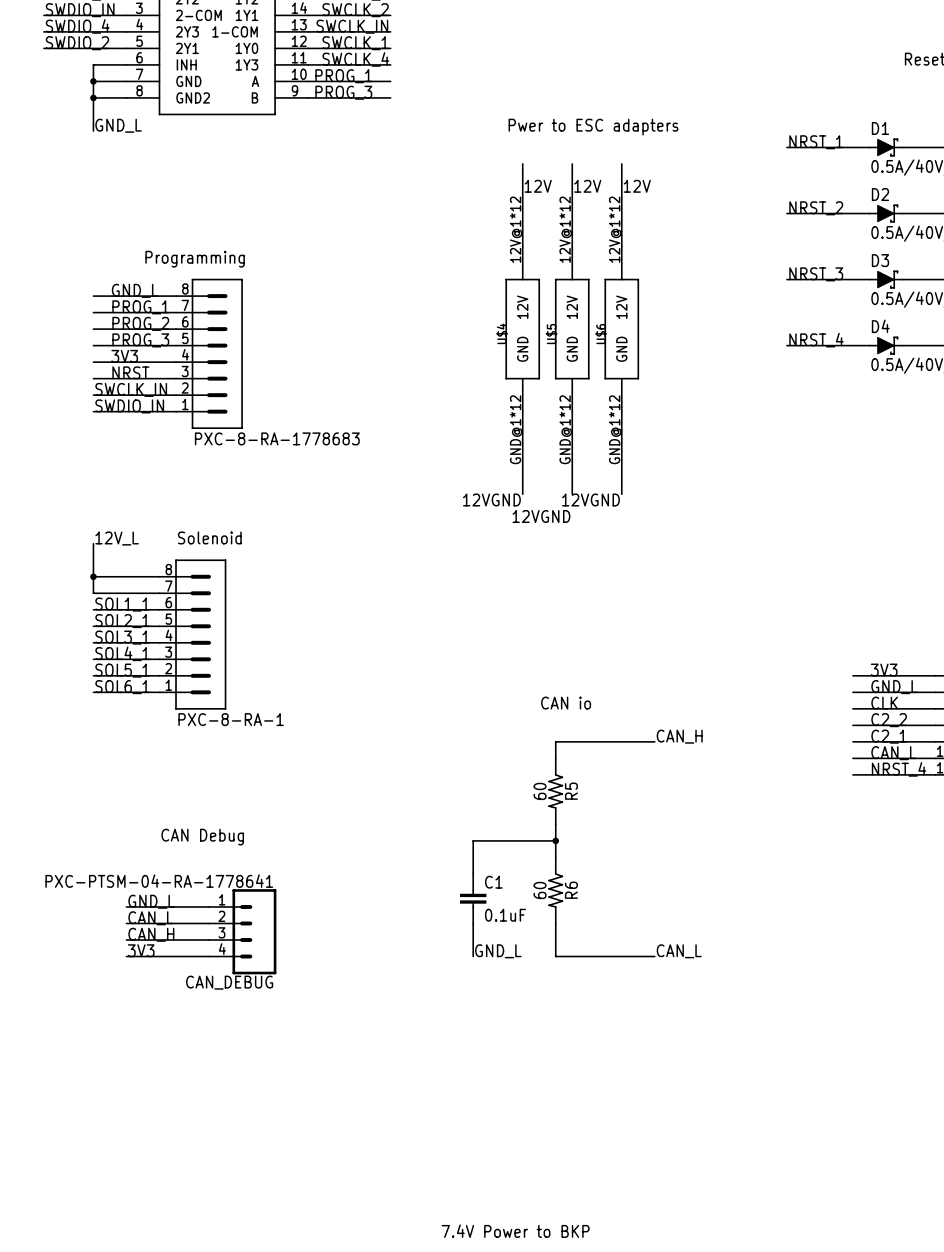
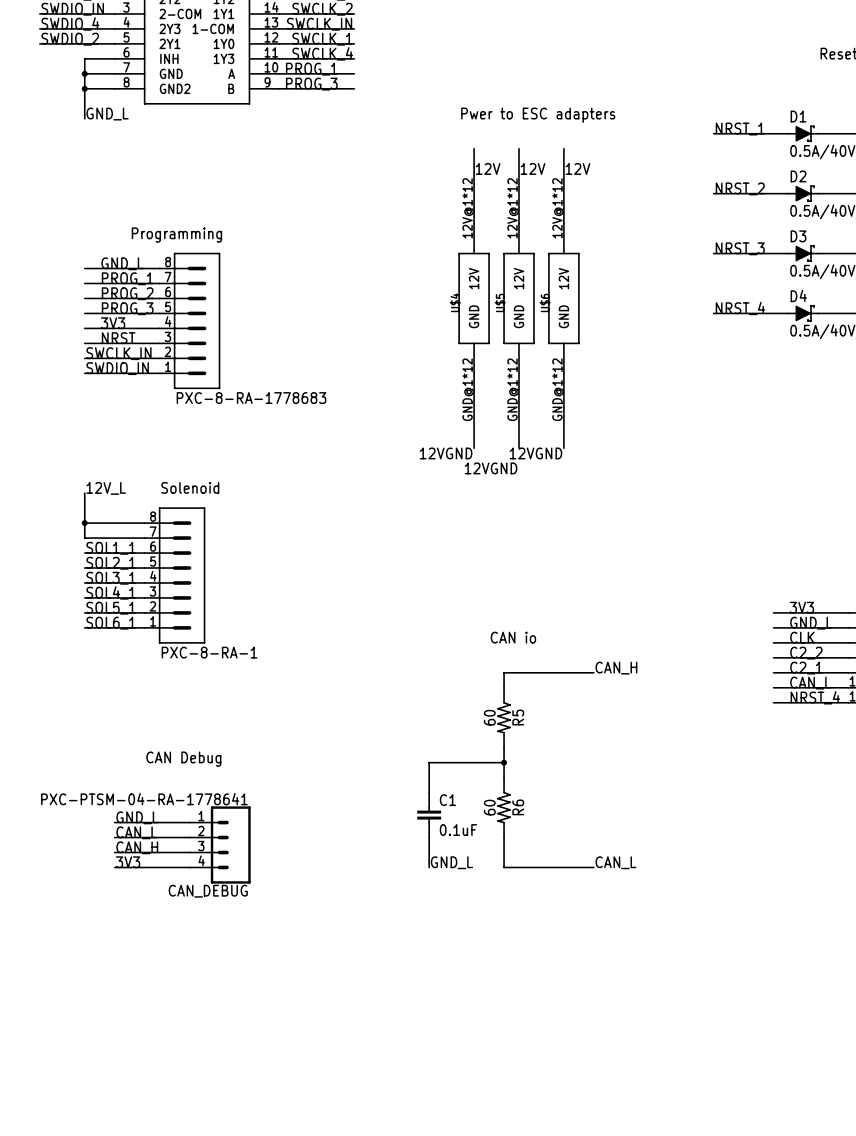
text: 7.4V Power to BKP (515, 1231) -> none

